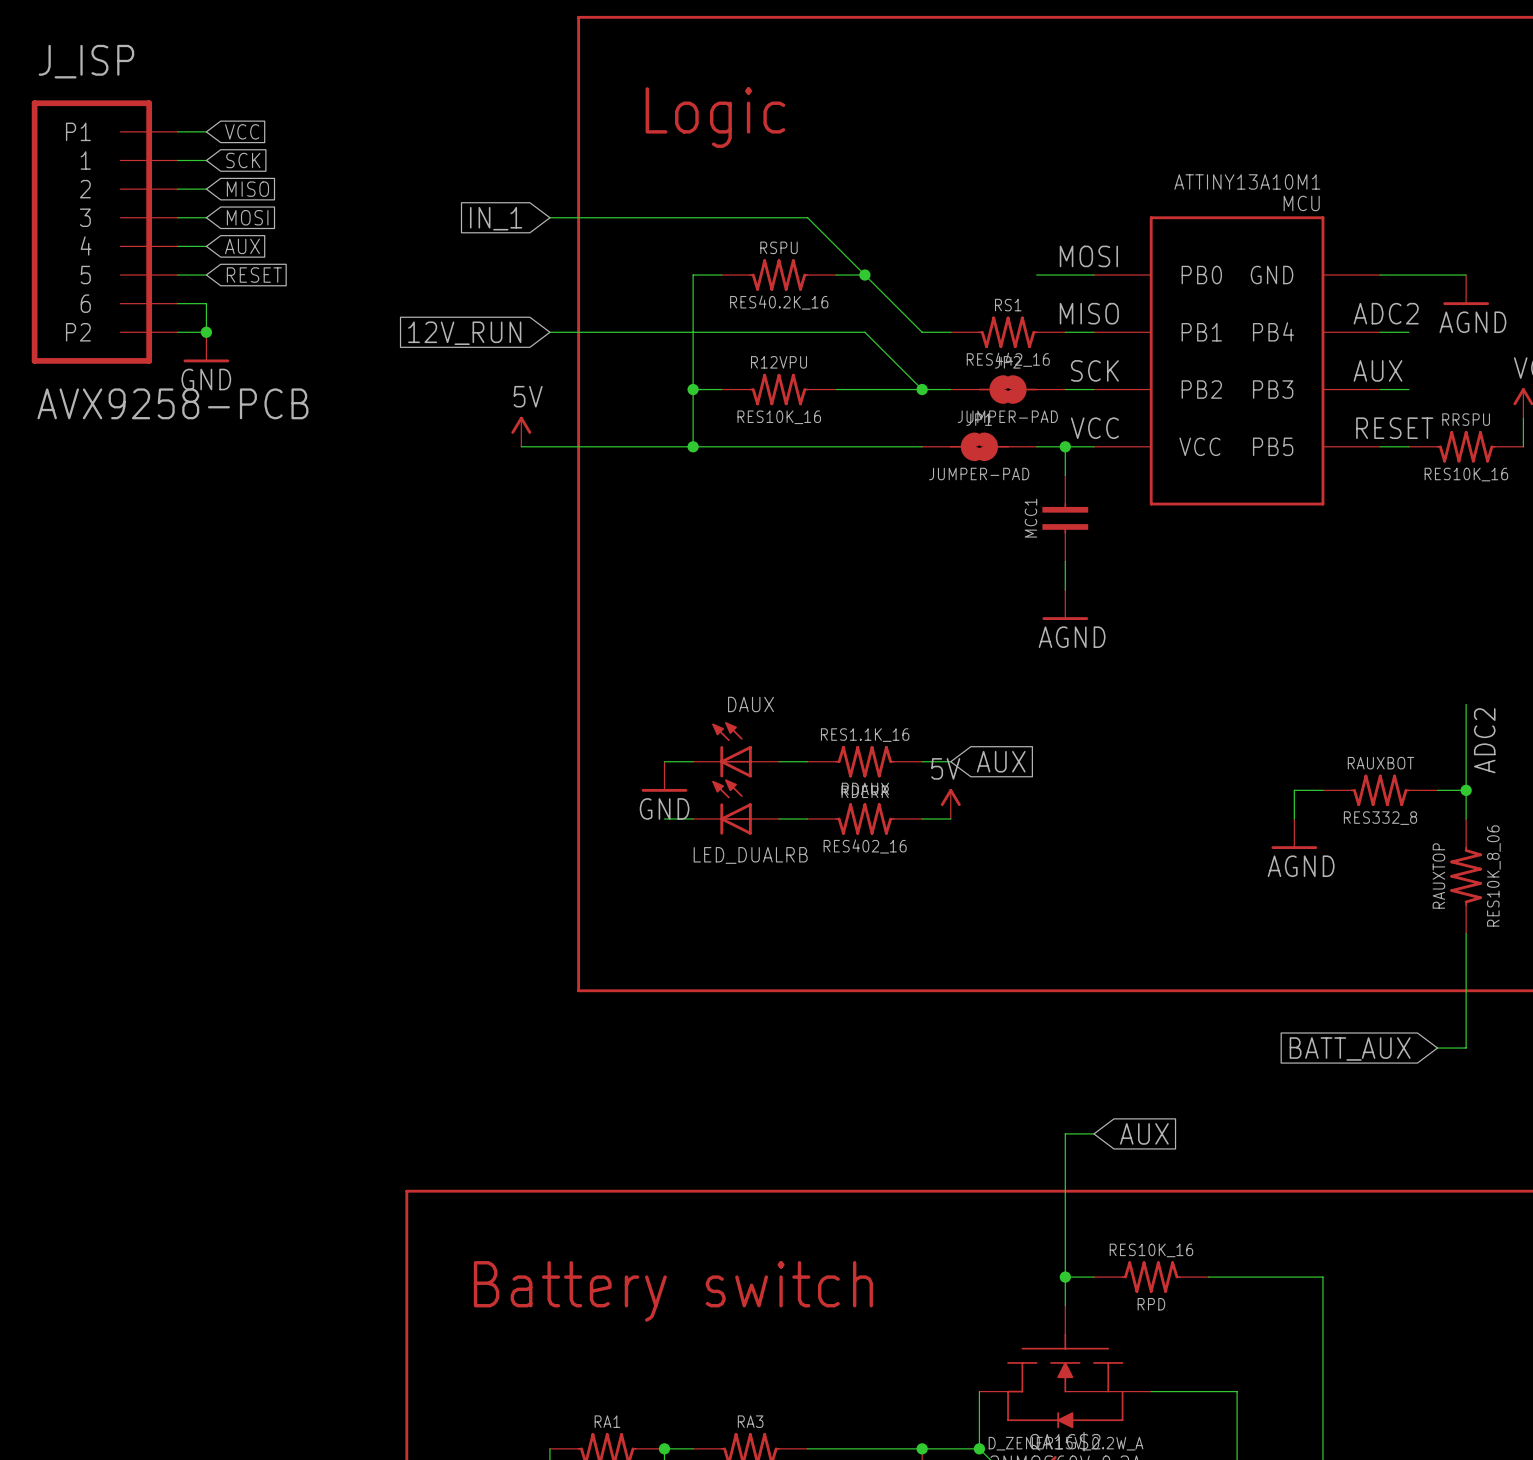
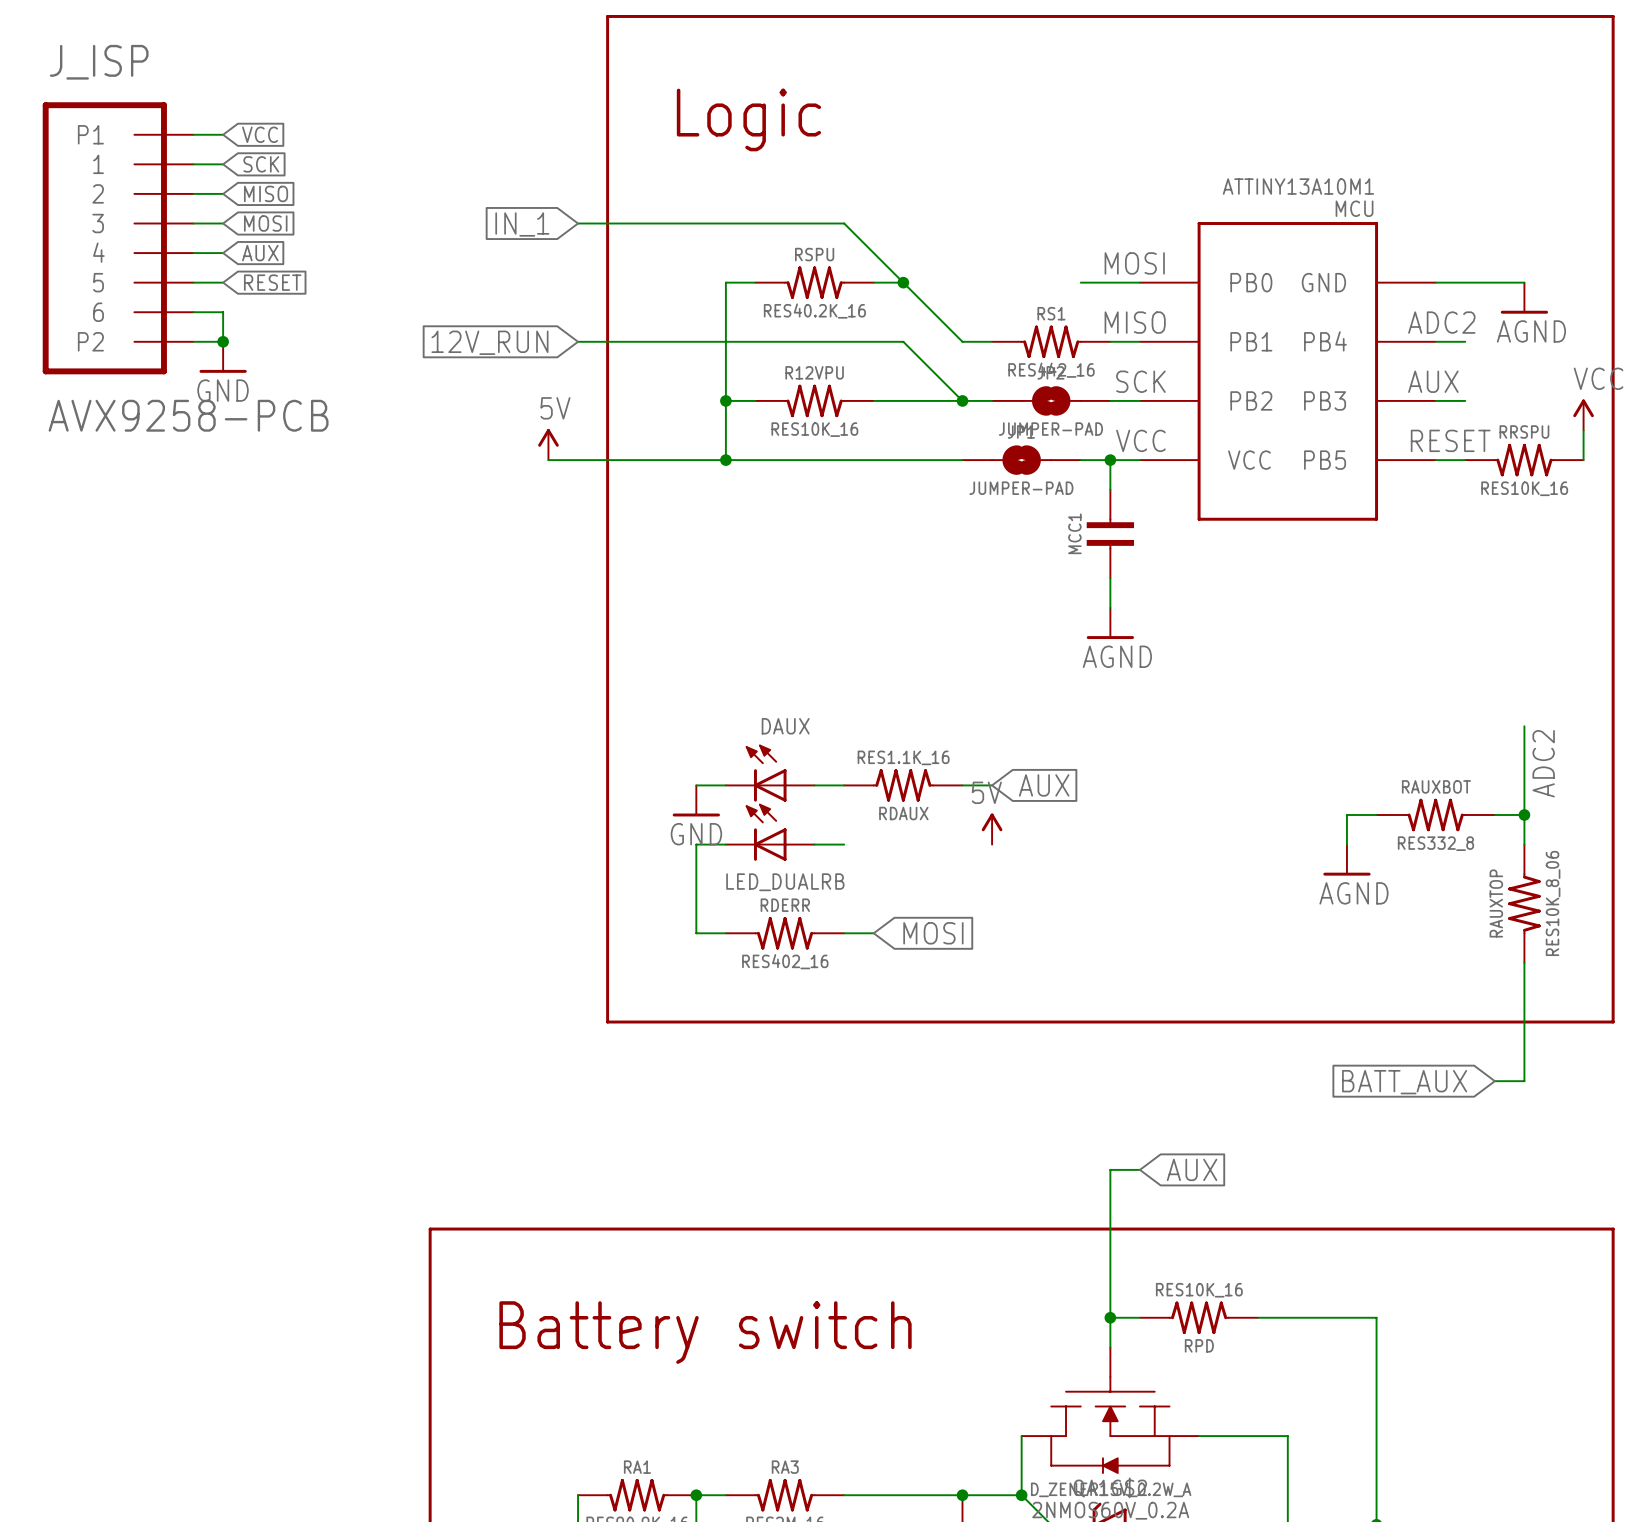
wire: none -> (696, 844) (696, 933) (725, 933)
RDERR position: (864, 818) -> (785, 933)
wire: (922, 818) (950, 818) -> (844, 933) (873, 933)
global label: none -> MOSI (933, 933)

